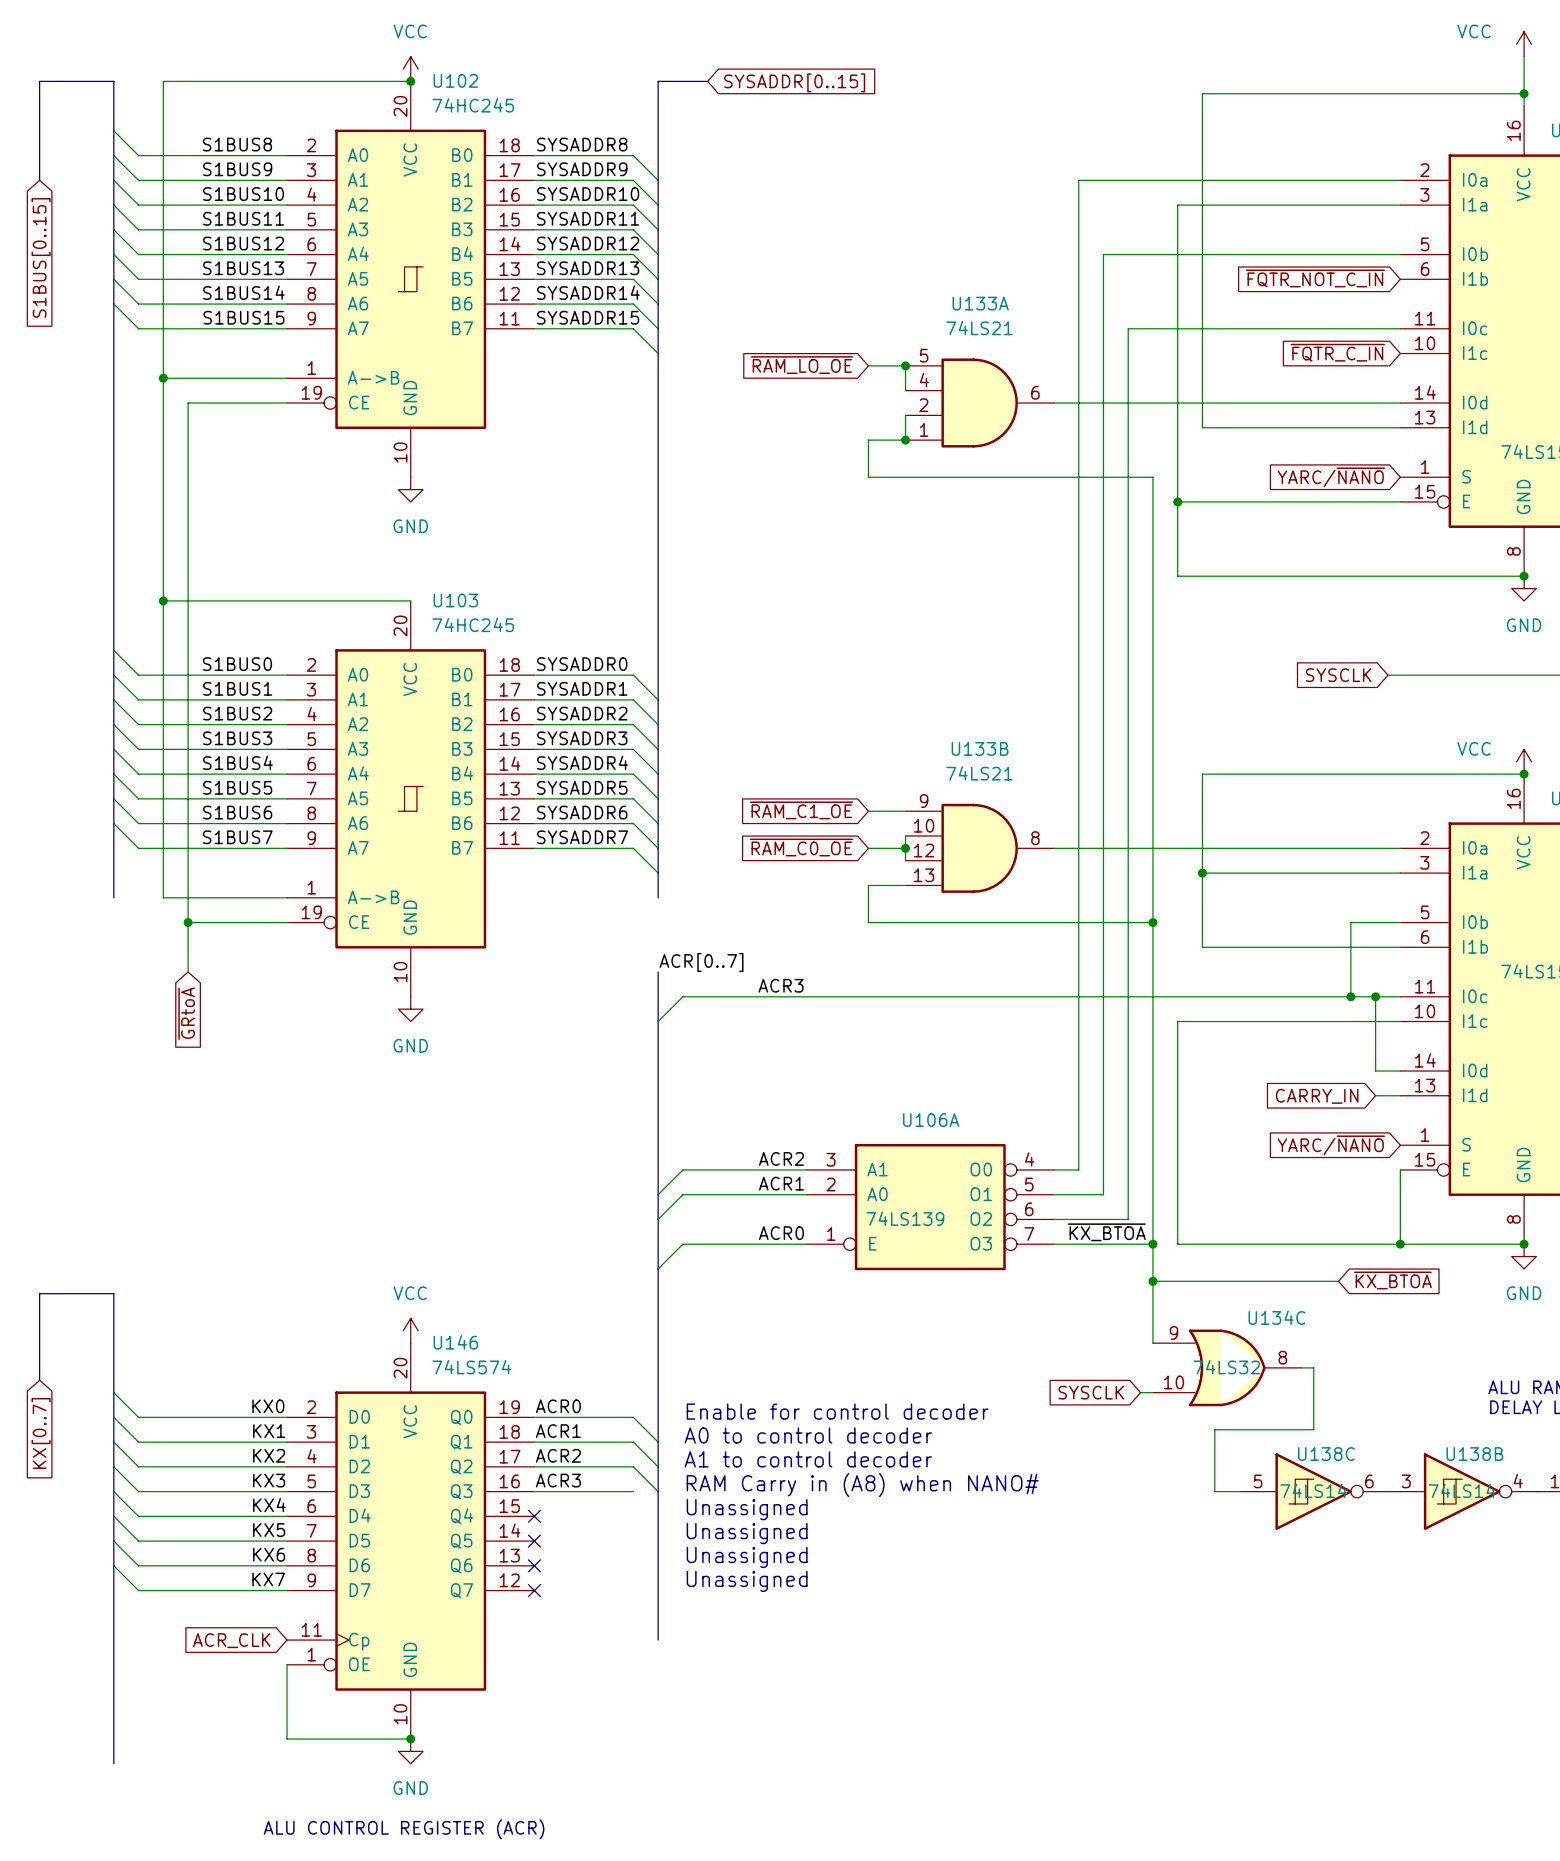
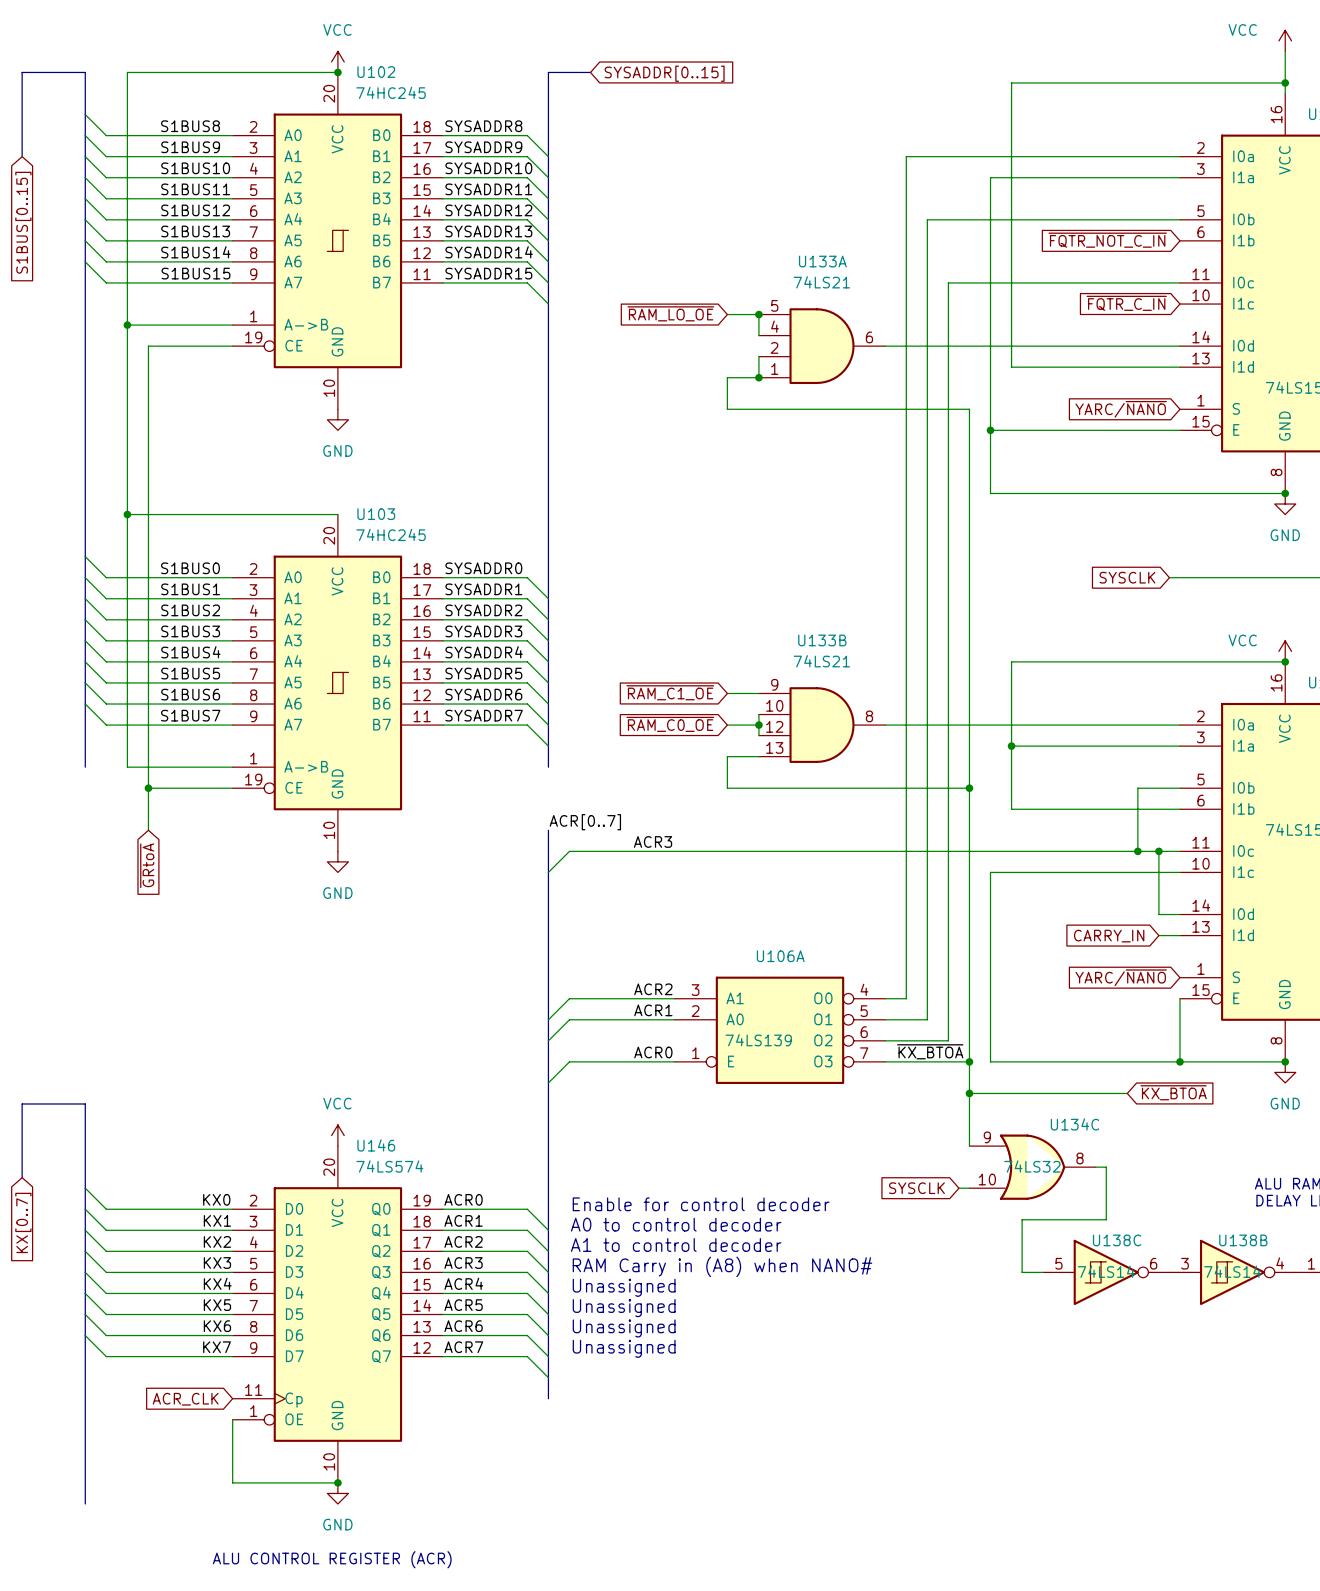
wire: none -> (527, 1272) (548, 1293)
label: none -> ACR4 (463, 1283)
wire: none -> (443, 1293) (527, 1293) (548, 1314)
no-connect mark: (534, 1516) -> none
label: none -> ACR5 (463, 1305)
wire: none -> (443, 1314) (527, 1314) (548, 1335)
no-connect mark: (534, 1541) -> none
label: none -> ACR6 (463, 1326)
wire: none -> (443, 1335) (527, 1335) (548, 1356)
no-connect mark: (534, 1565) -> none
label: none -> ACR7 (463, 1347)
wire: none -> (443, 1356) (527, 1356) (548, 1377)
no-connect mark: (534, 1590) -> none

